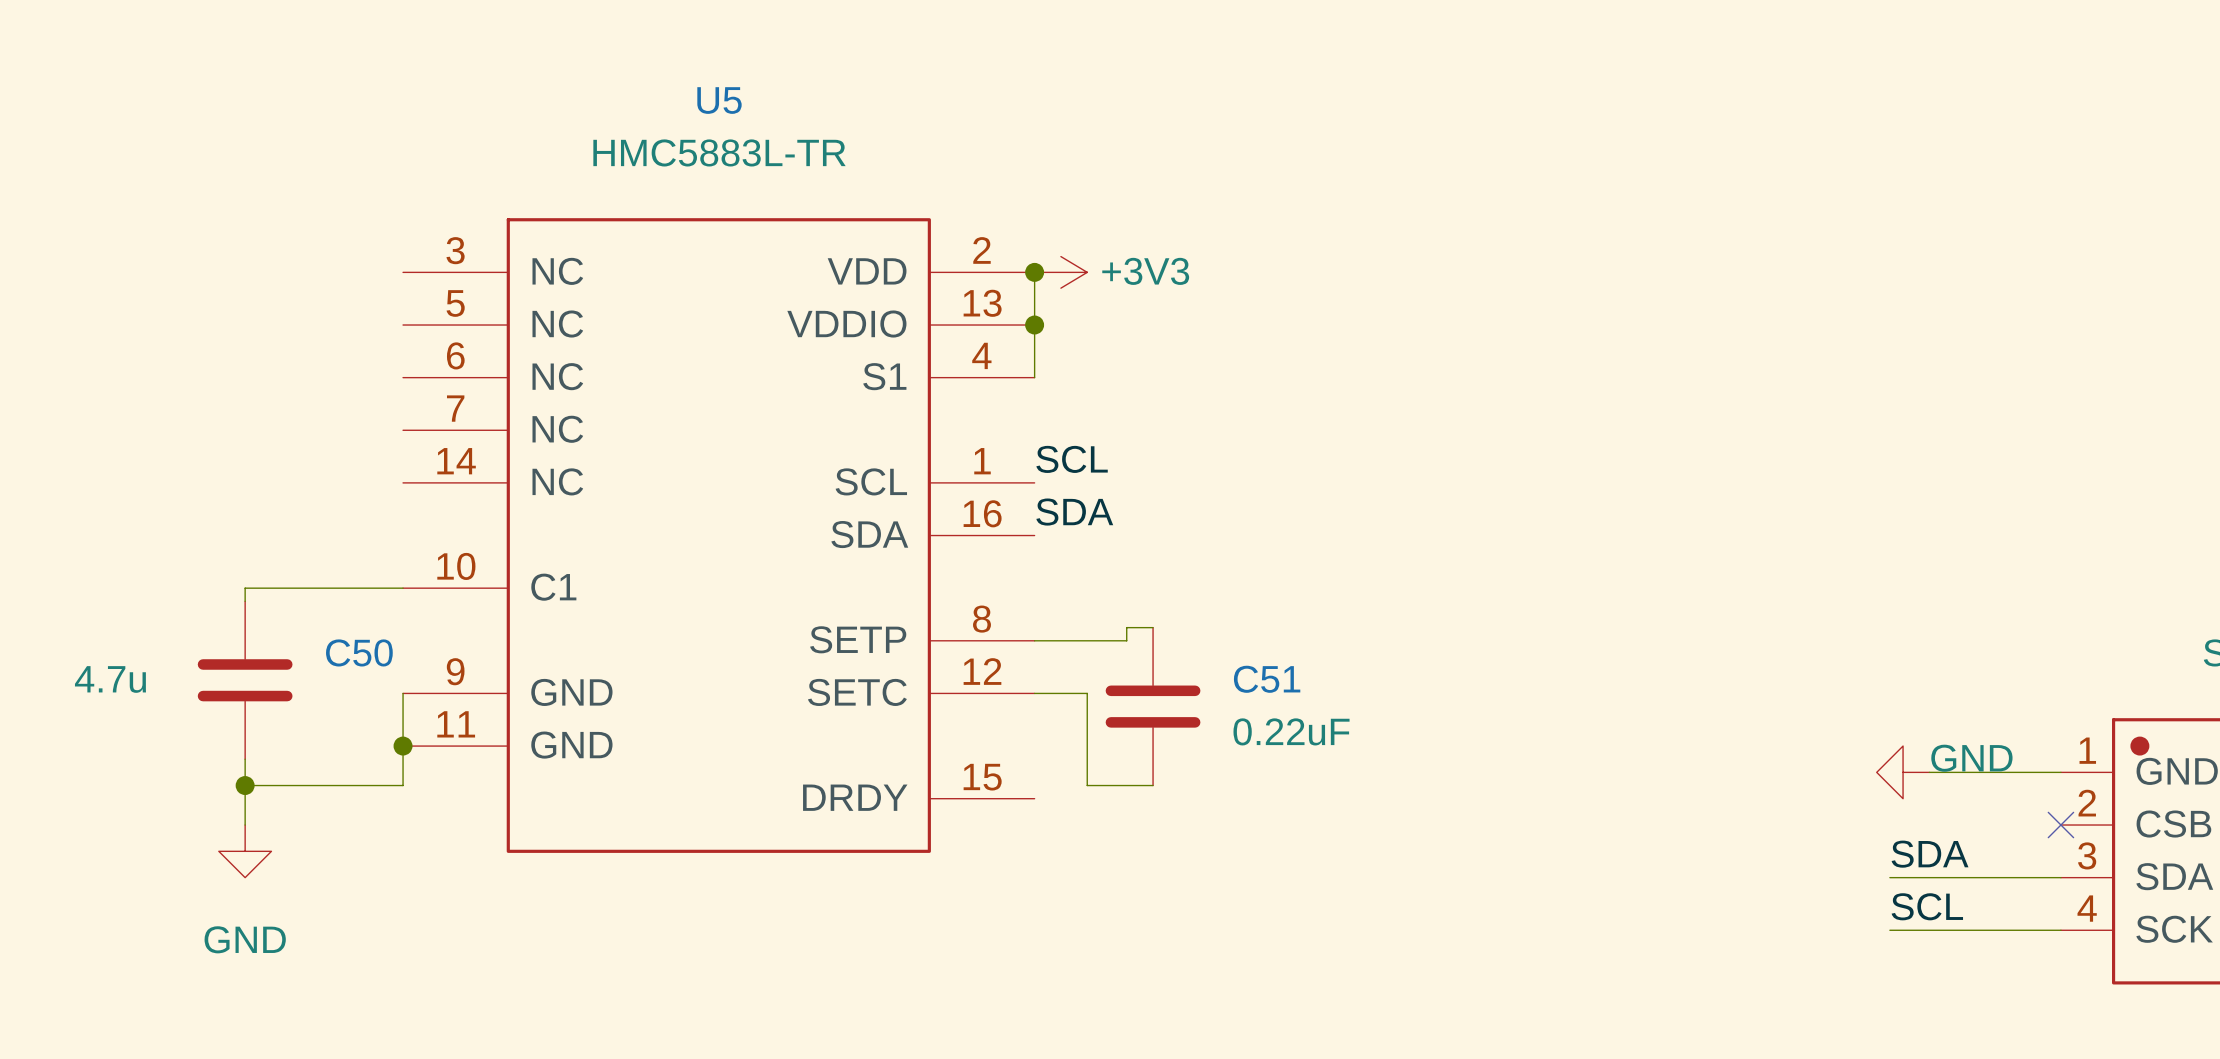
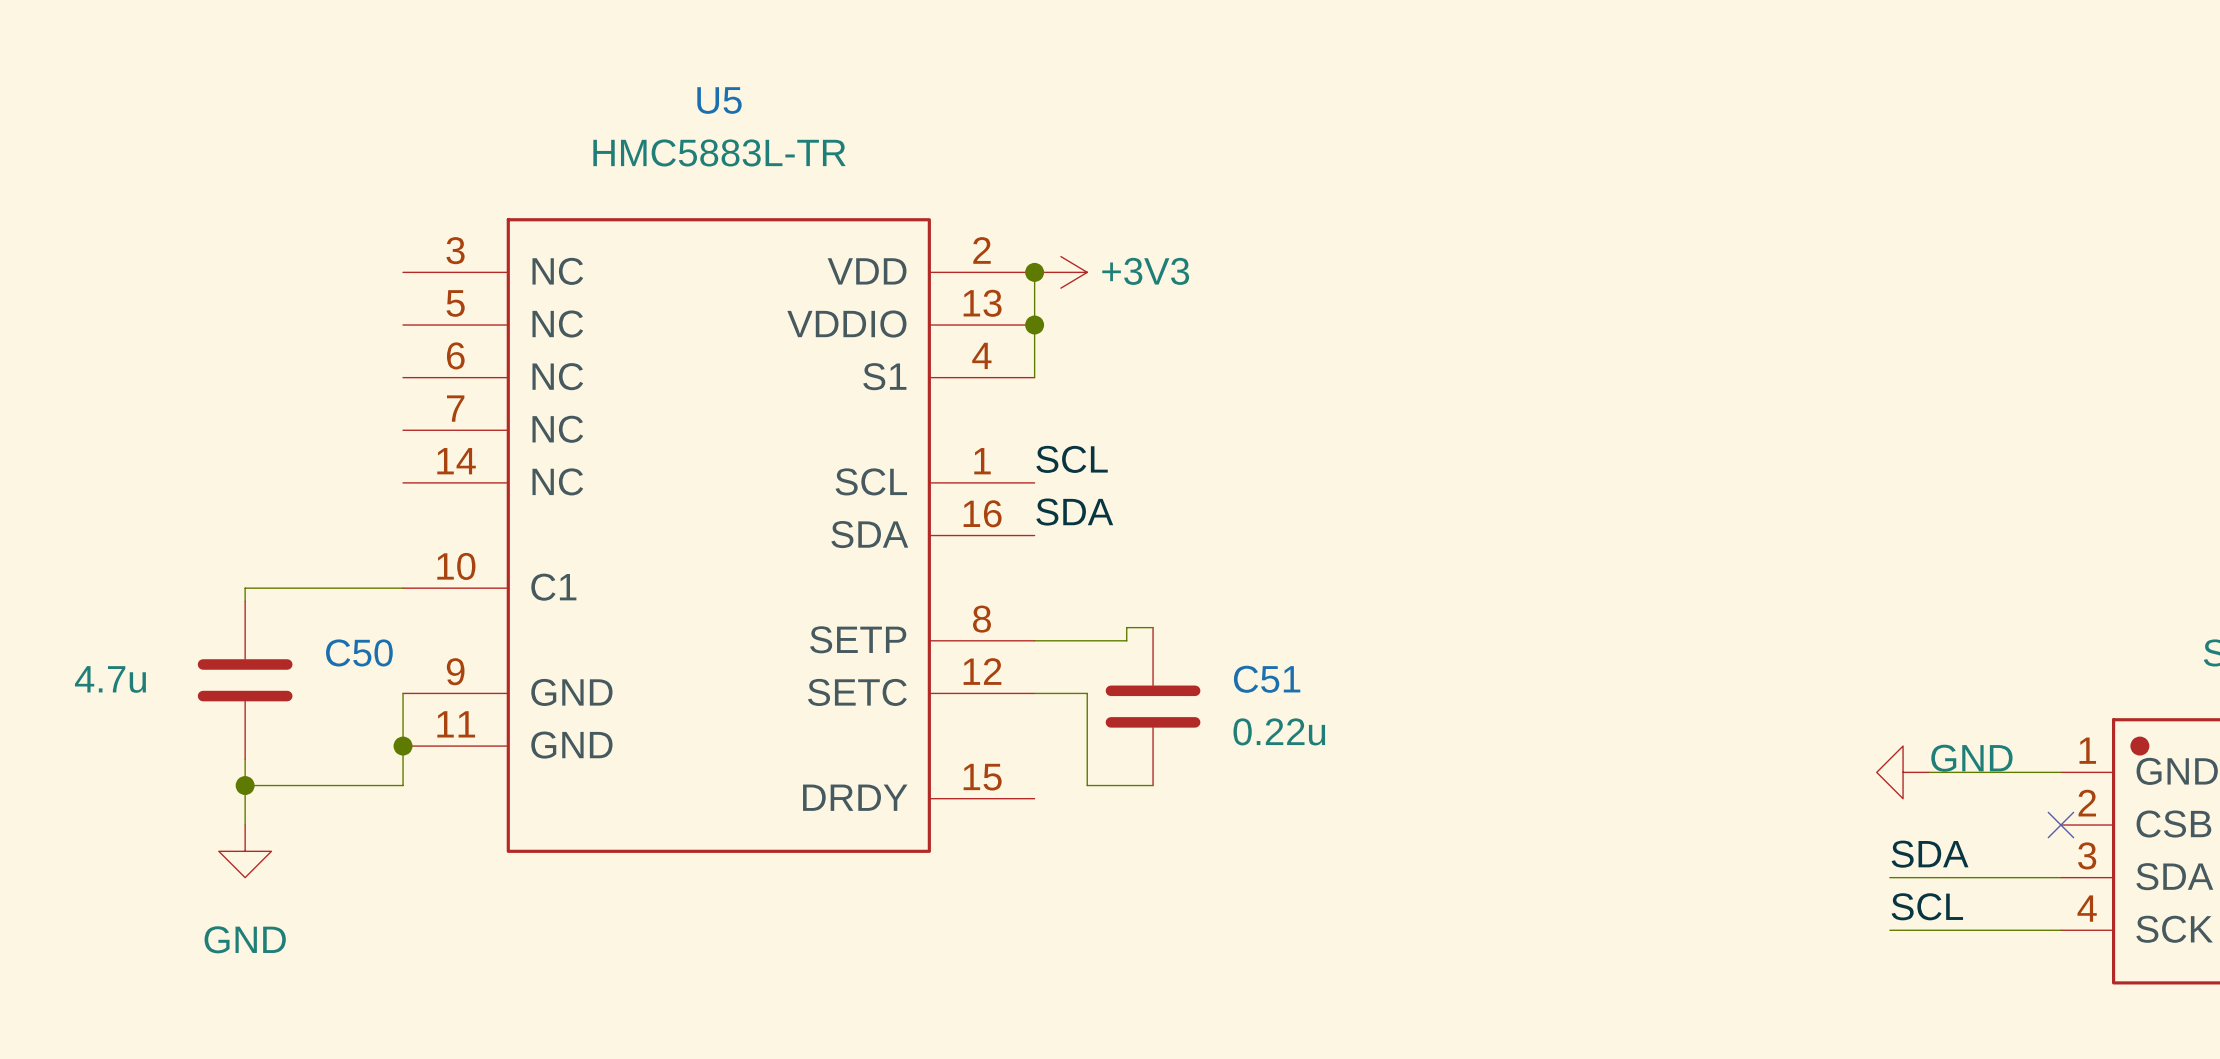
C51 value: 0.22uF (1291, 731) -> 0.22u (1279, 731)

